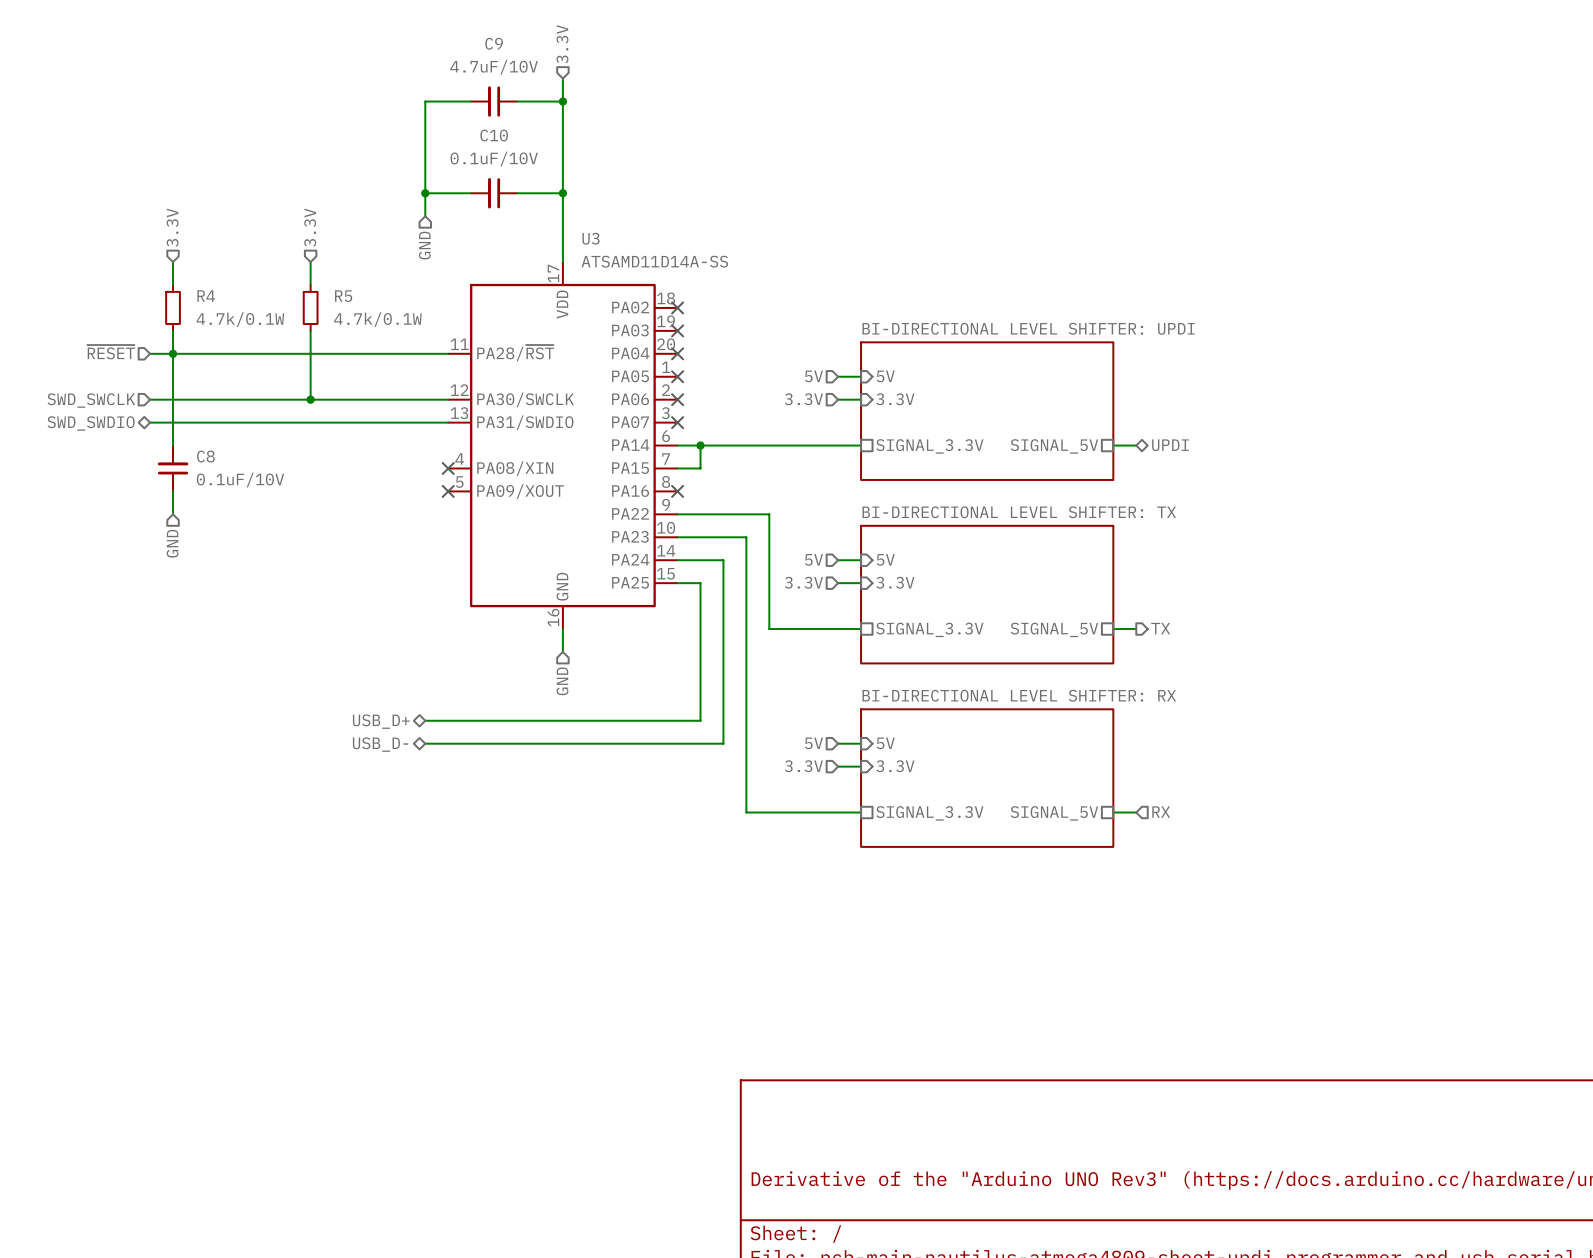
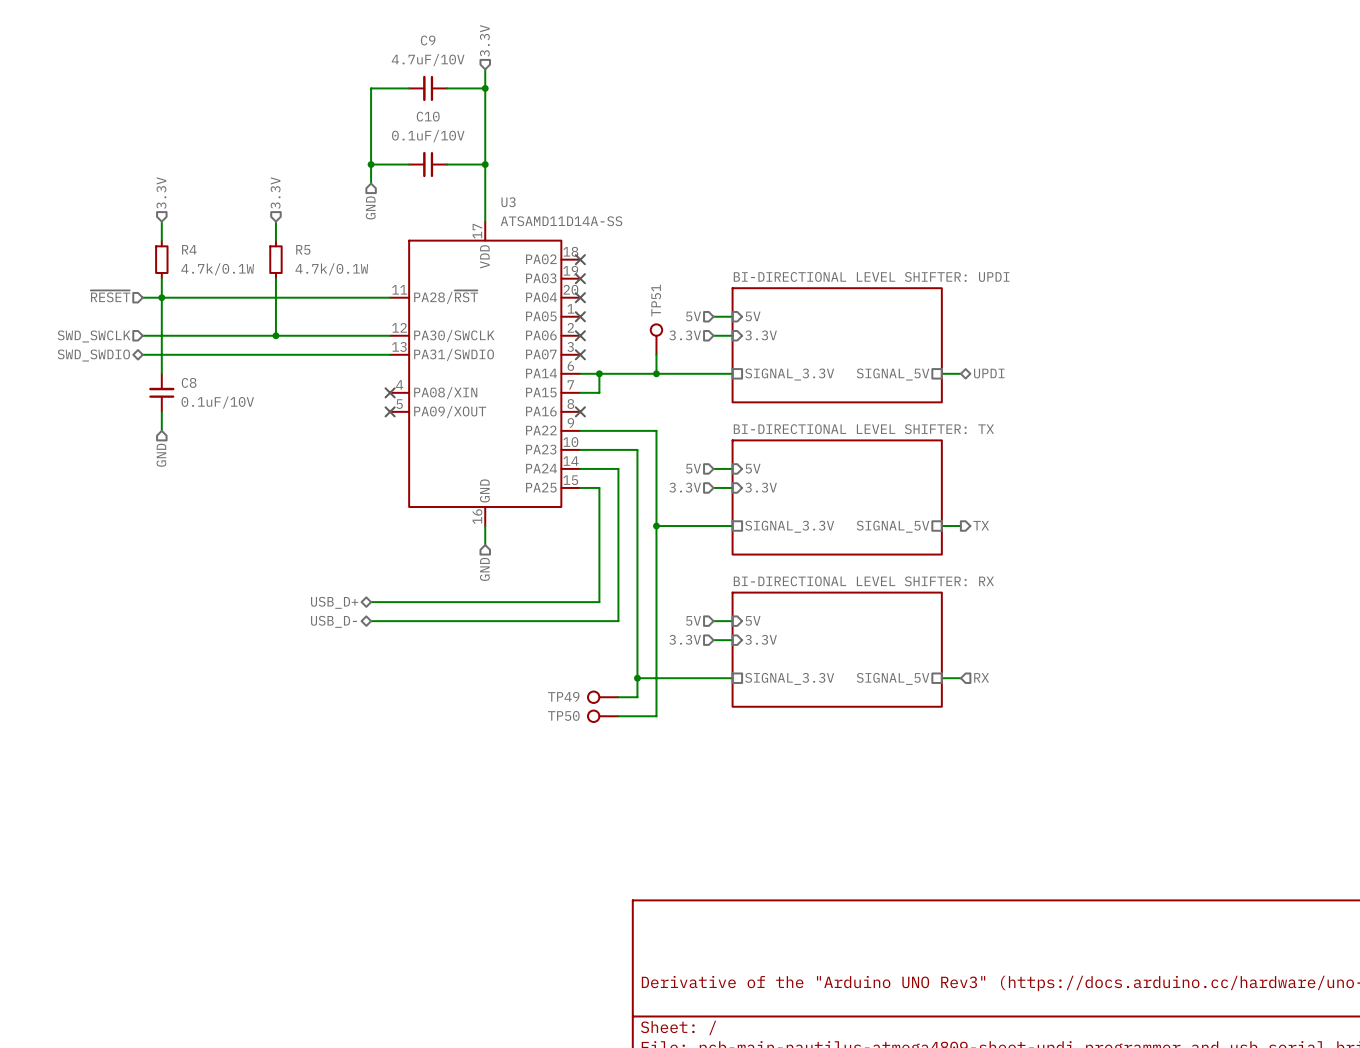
TP51: none -> (656, 339)
wire: none -> (656, 354) (656, 373)
junction: none -> (656, 373)
wire: none -> (656, 526) (656, 716) (618, 716)
junction: none -> (656, 526)
wire: none -> (637, 678) (637, 697) (618, 697)
junction: none -> (637, 678)
TP49: none -> (603, 697)
TP50: none -> (603, 716)

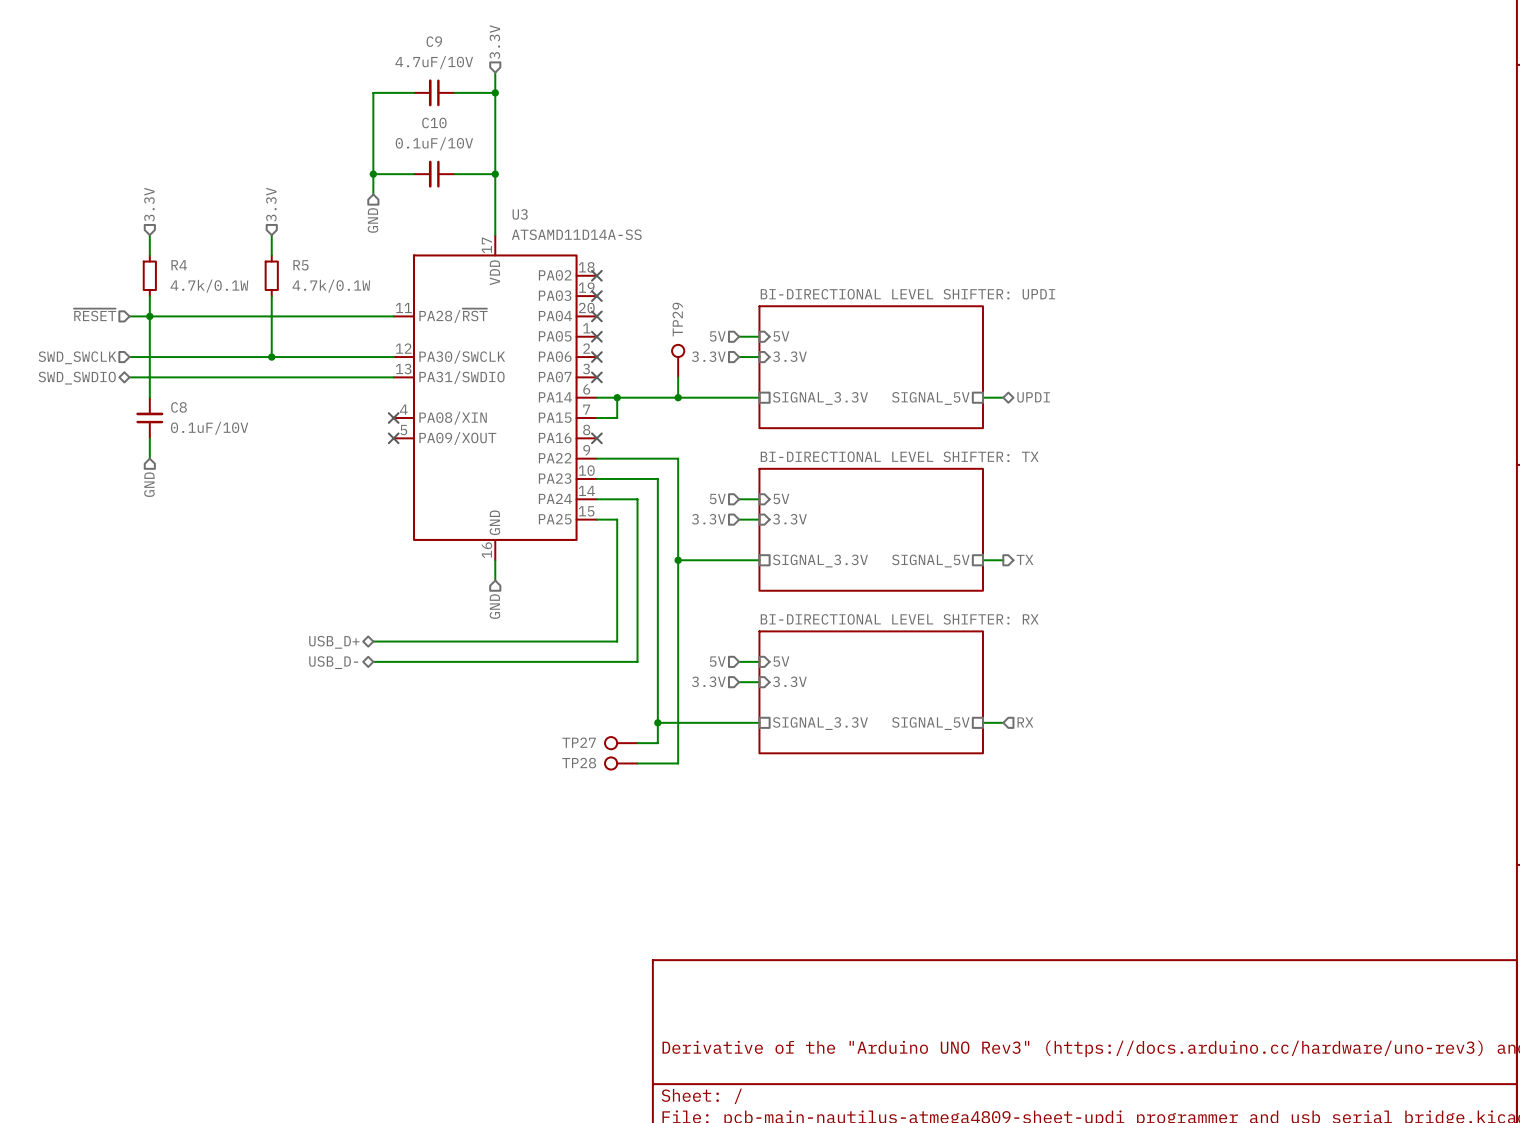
TP51 name: TP51 (656, 300) -> TP29 (677, 319)
TP49 name: TP49 (563, 696) -> TP27 (579, 742)
TP50 name: TP50 (563, 715) -> TP28 (579, 763)

